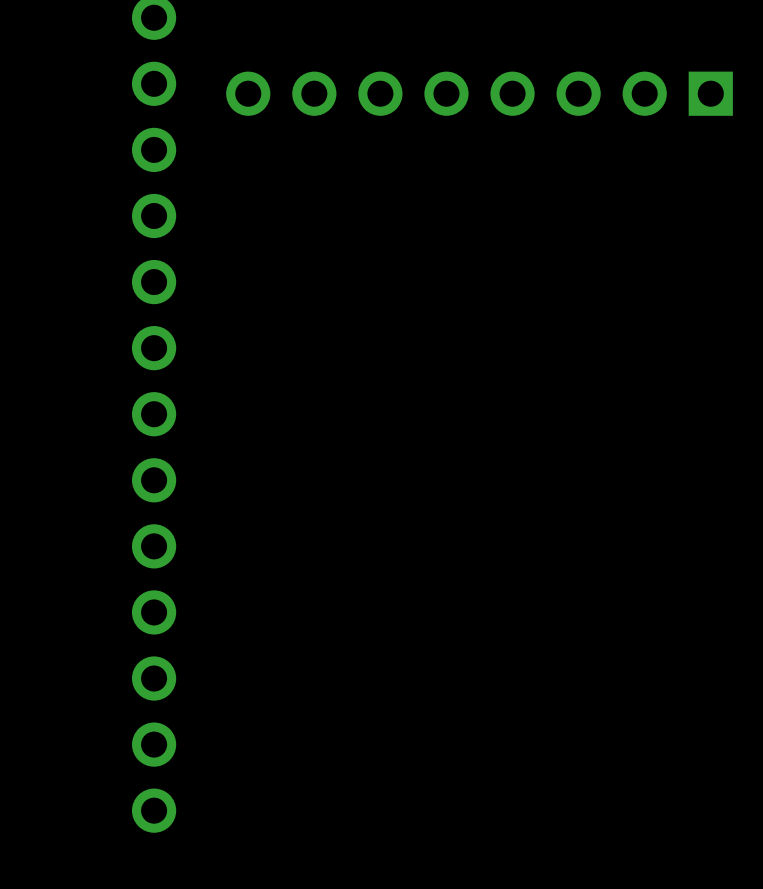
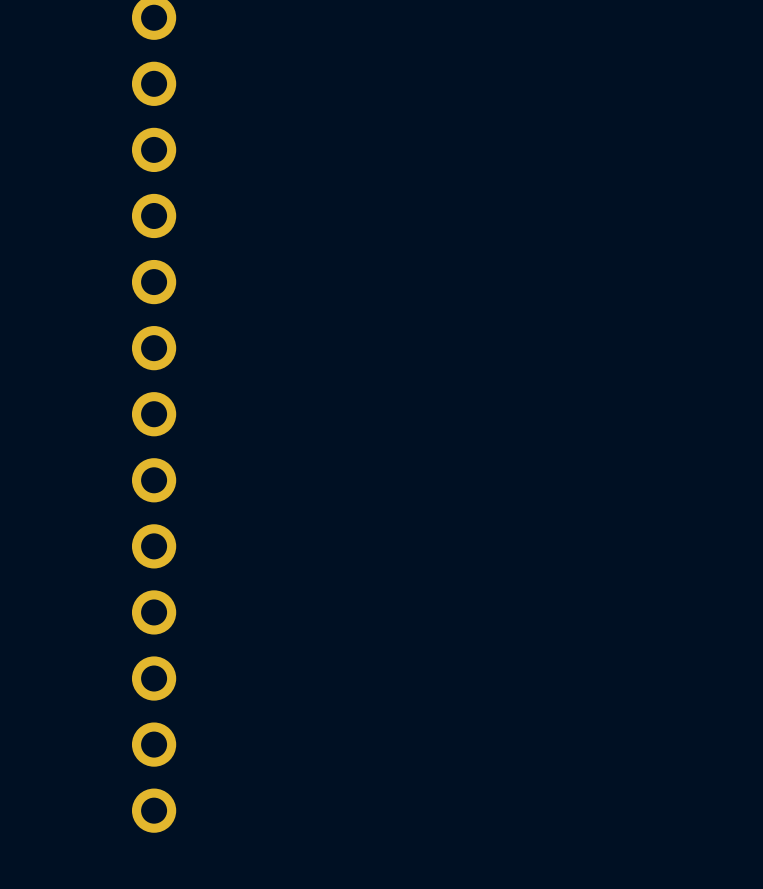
part: (479, 93) -> none

